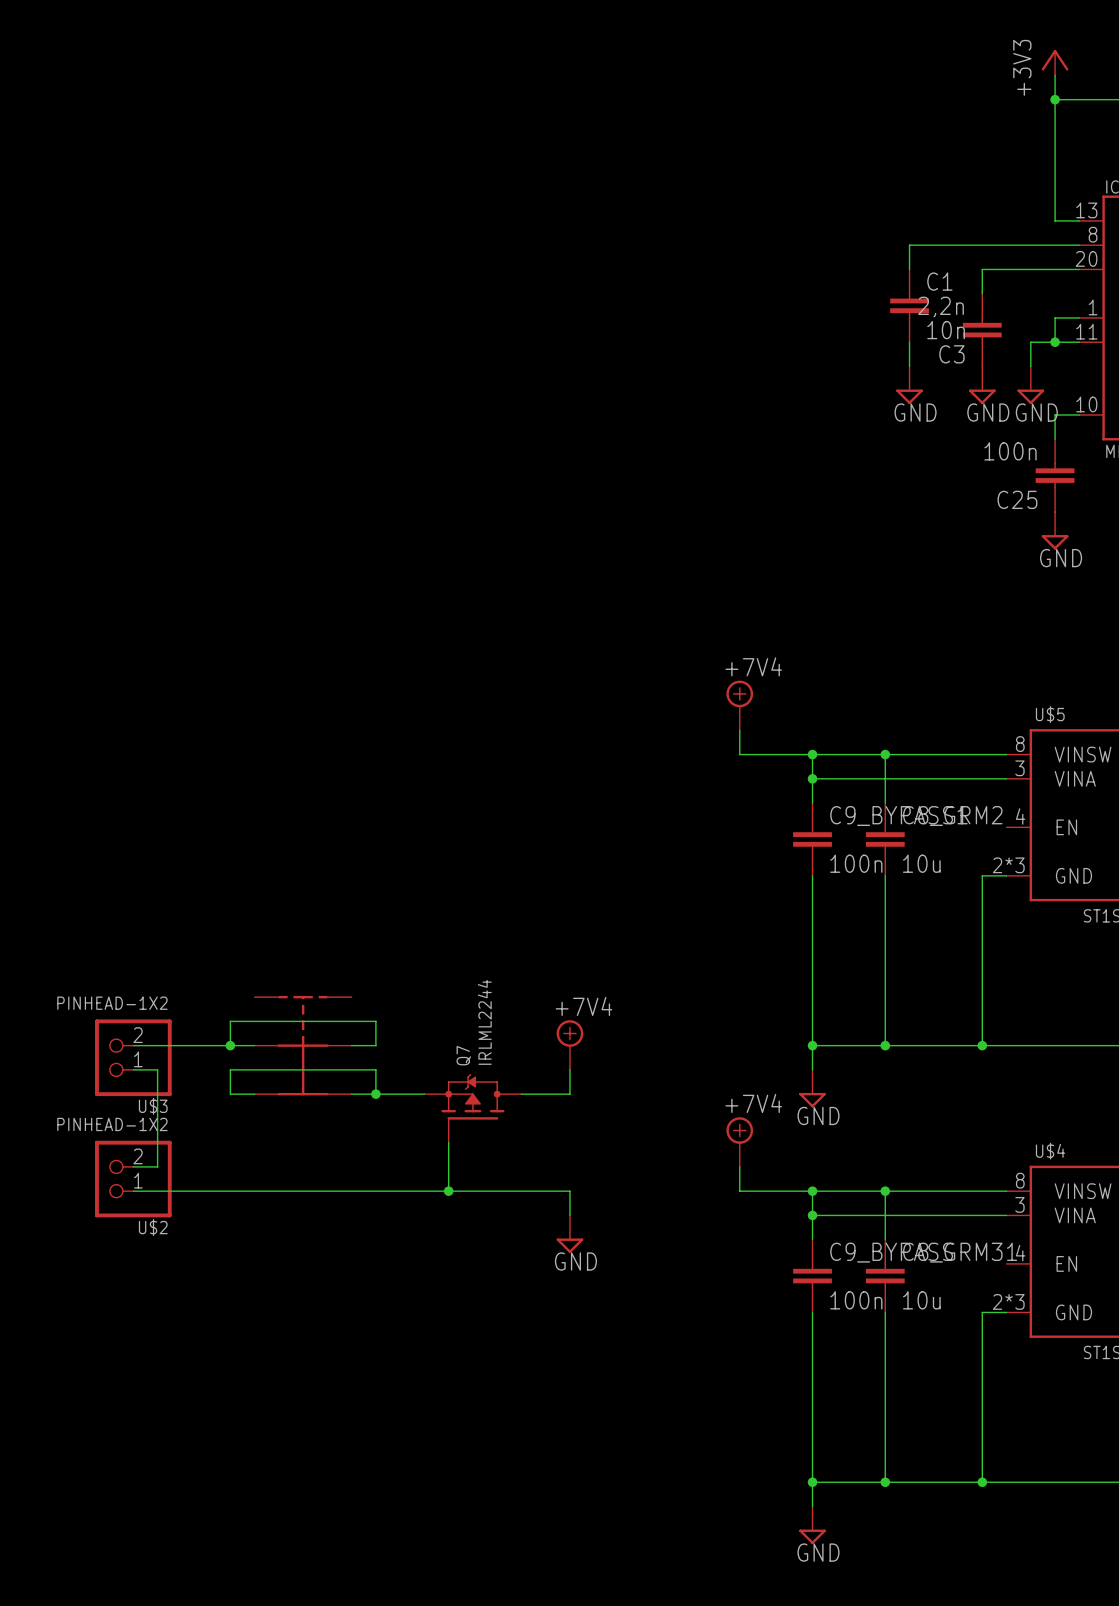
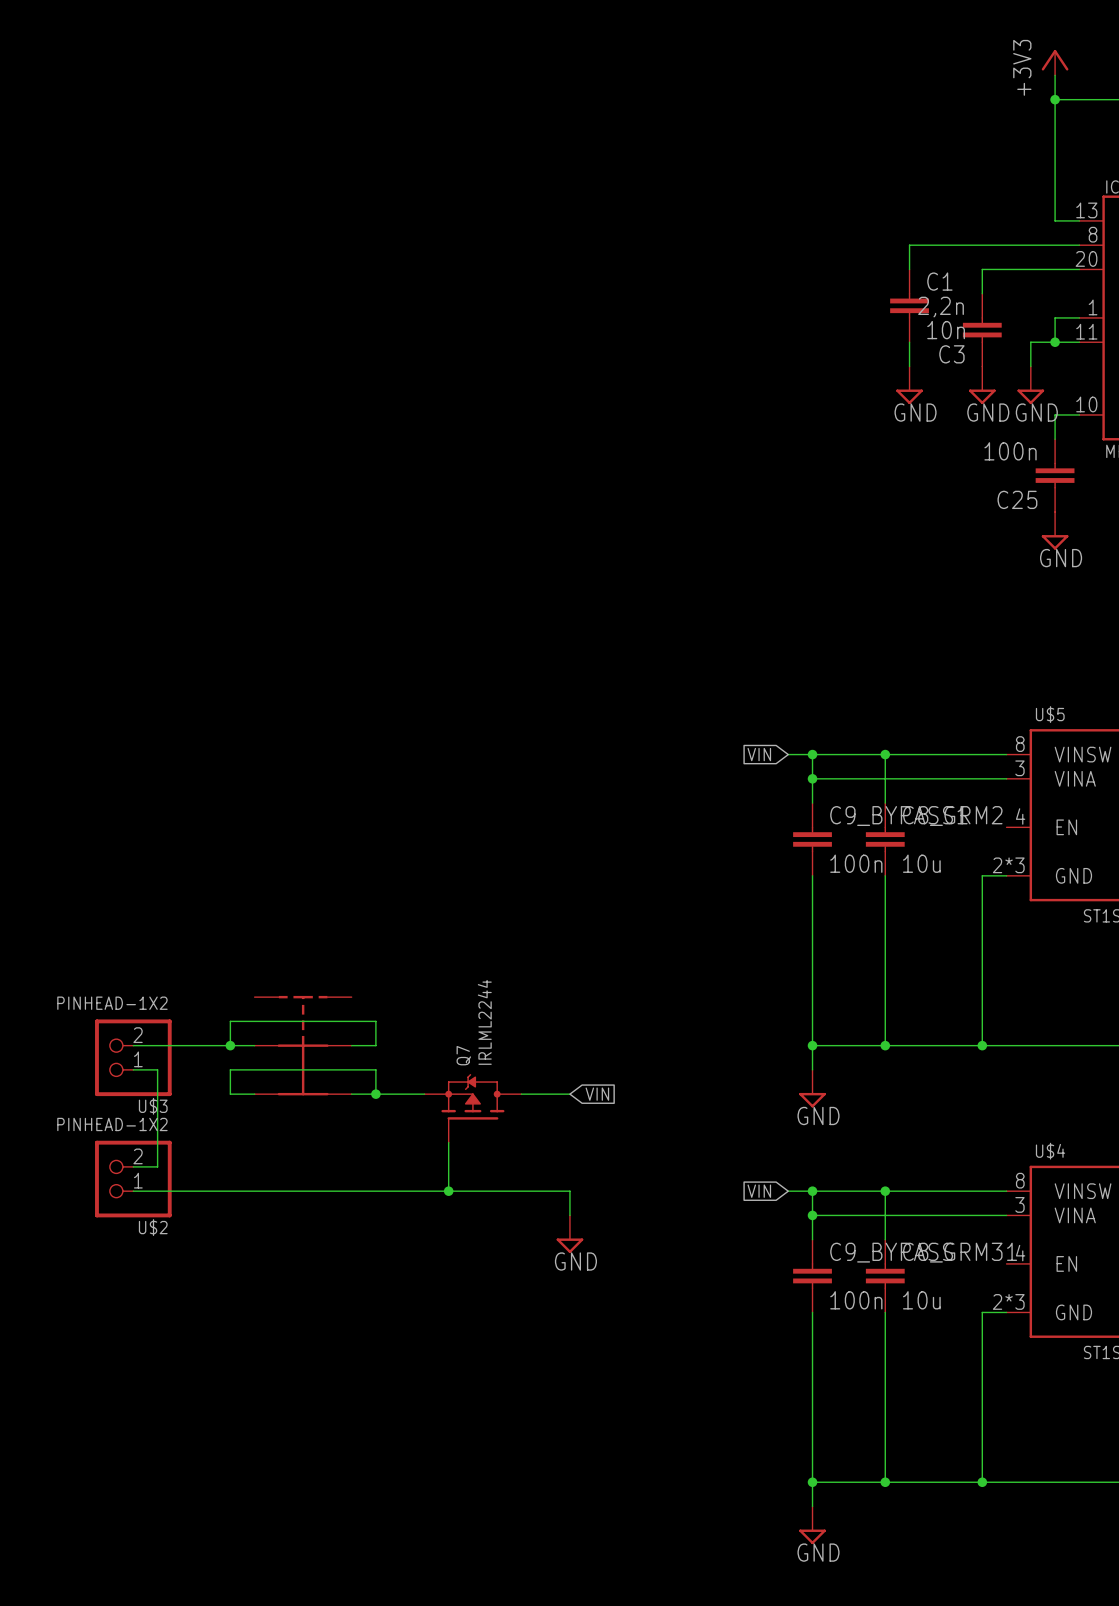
power symbol: +7V4 (739, 705) -> none
wire: (739, 730) (739, 754) (788, 754) -> none
global label: none -> VIN (759, 754)
power symbol: +7V4 (569, 1045) -> none
wire: (569, 1069) (569, 1094) -> none
global label: none -> VIN (597, 1094)
power symbol: +7V4 (739, 1142) -> none
wire: (739, 1166) (739, 1191) (788, 1191) -> none
global label: none -> VIN (759, 1191)

